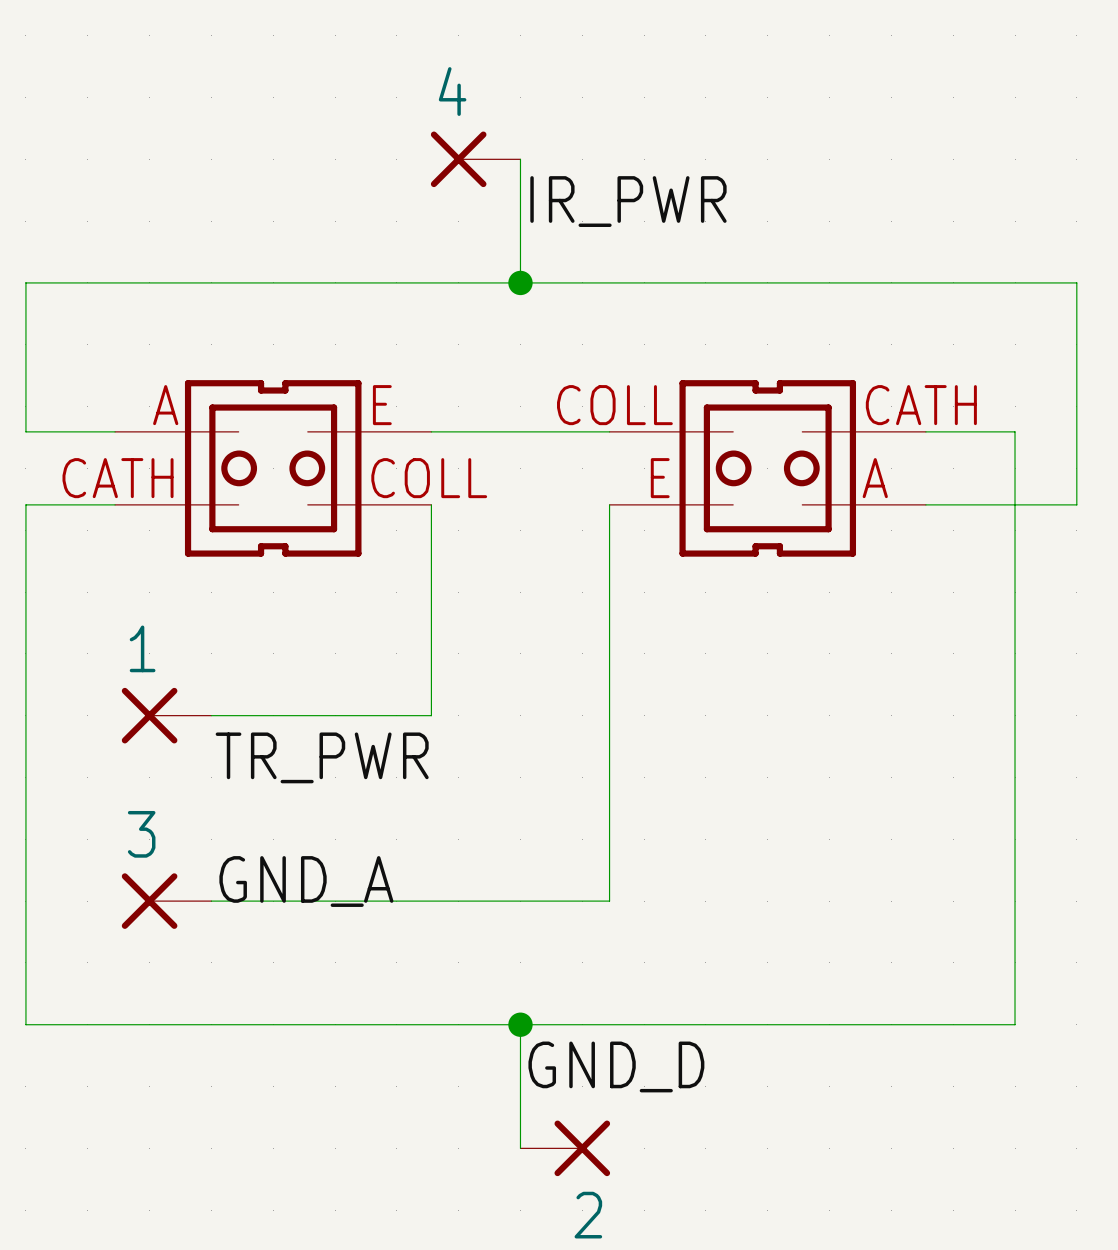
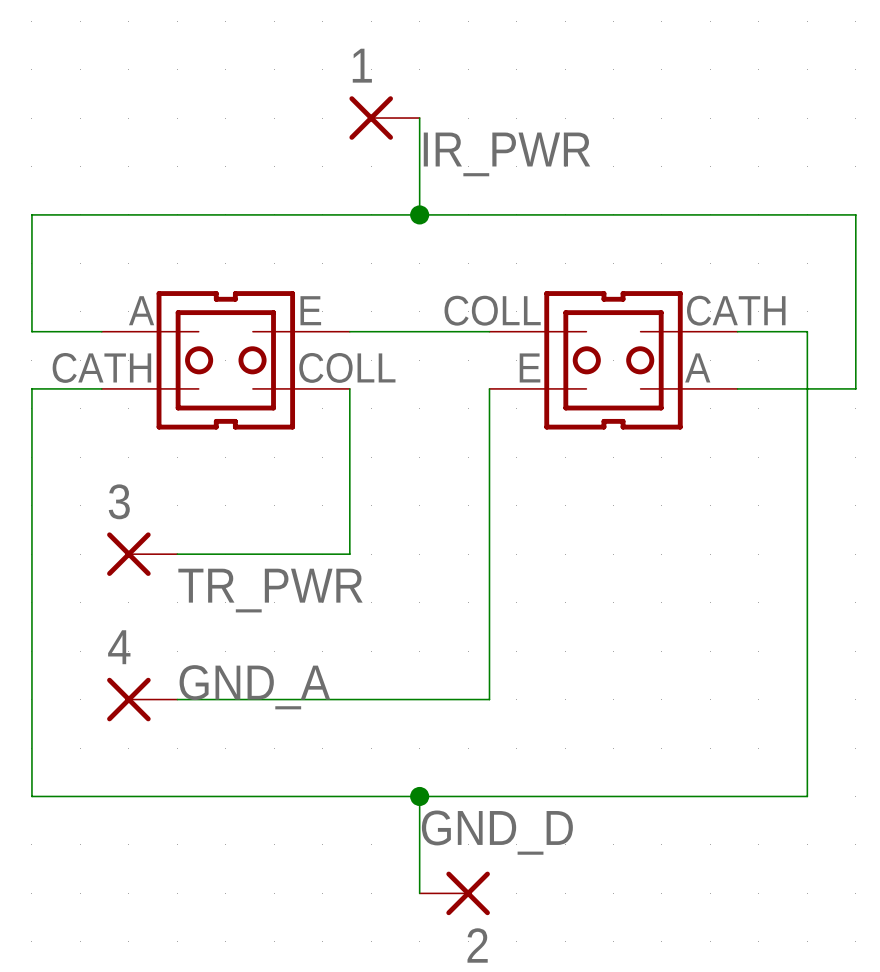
4 name: 4 (452, 91) -> 1 (362, 65)
1 name: 1 (142, 648) -> 3 (119, 501)
3 name: 3 (141, 834) -> 4 (119, 647)

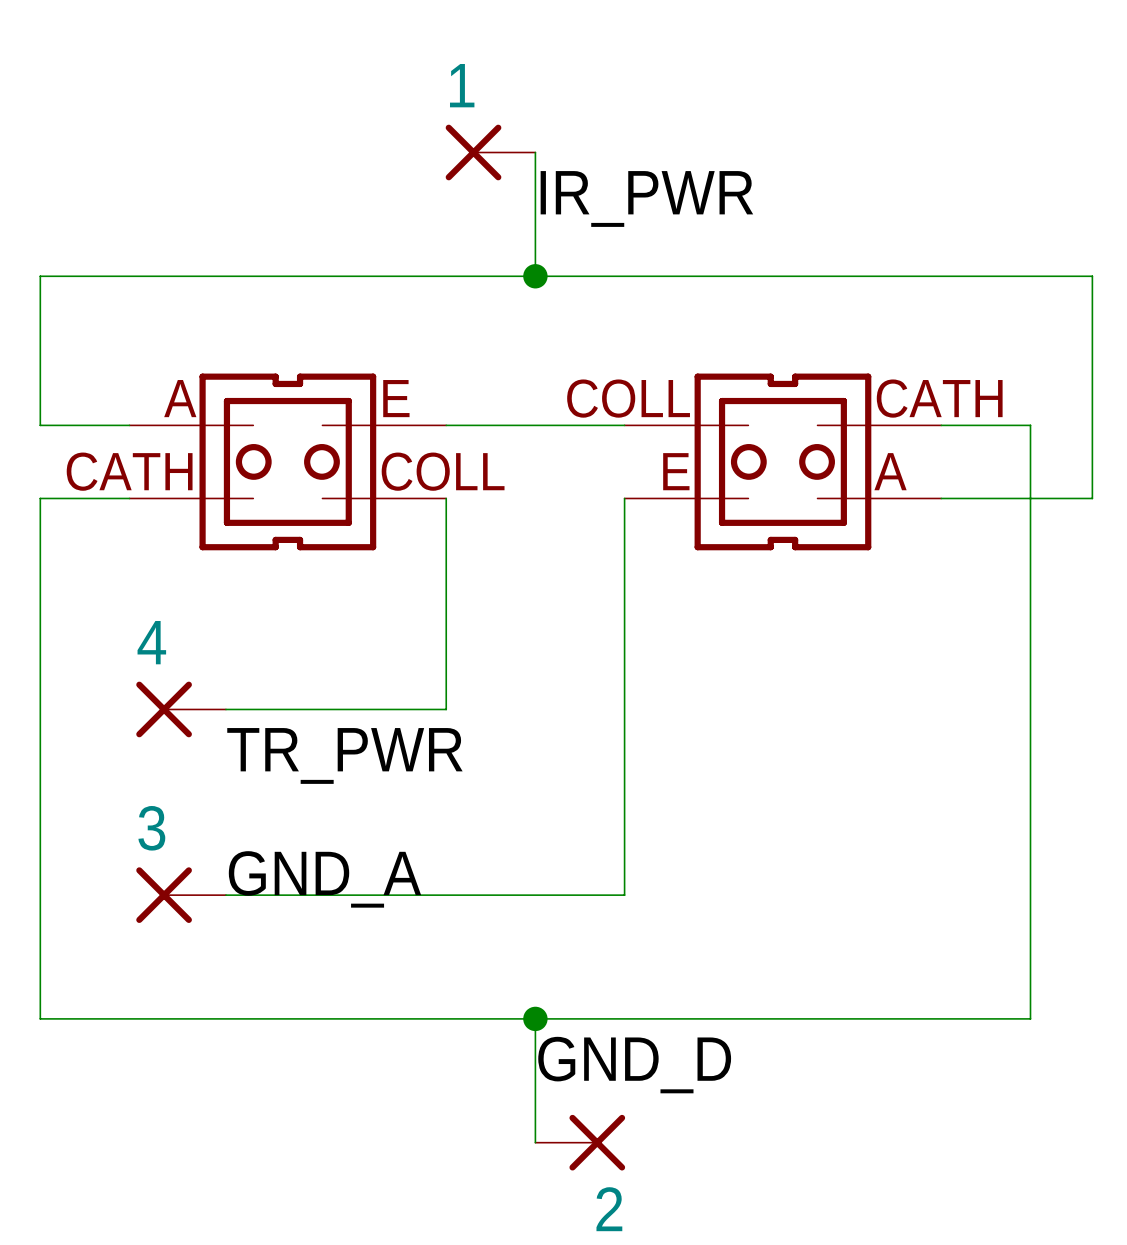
3 name: 3 (119, 501) -> 4 (151, 642)
4 name: 4 (119, 647) -> 3 (151, 828)

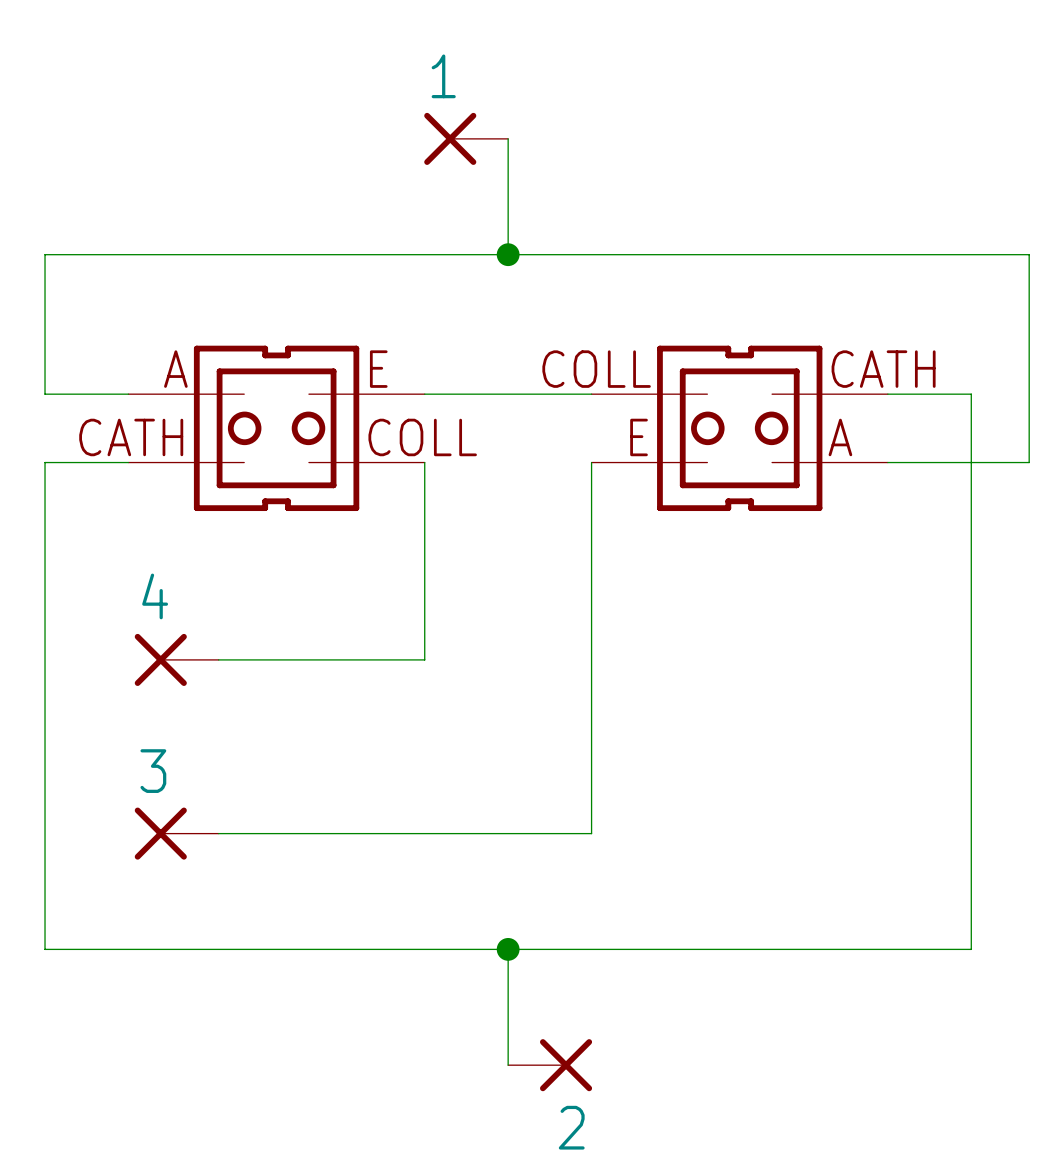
label: IR_PWR (646, 198) -> none
label: TR_PWR (344, 755) -> none
label: GND_A (324, 879) -> none
label: GND_D (634, 1065) -> none

